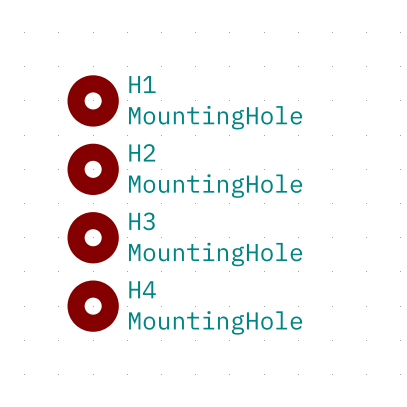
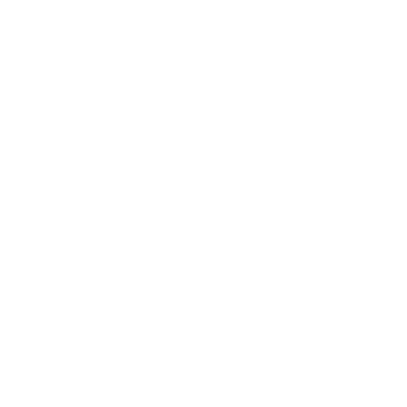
H1: MountingHole (93, 100) -> none
H2: MountingHole (93, 169) -> none
H3: MountingHole (93, 237) -> none
H4: MountingHole (93, 306) -> none

